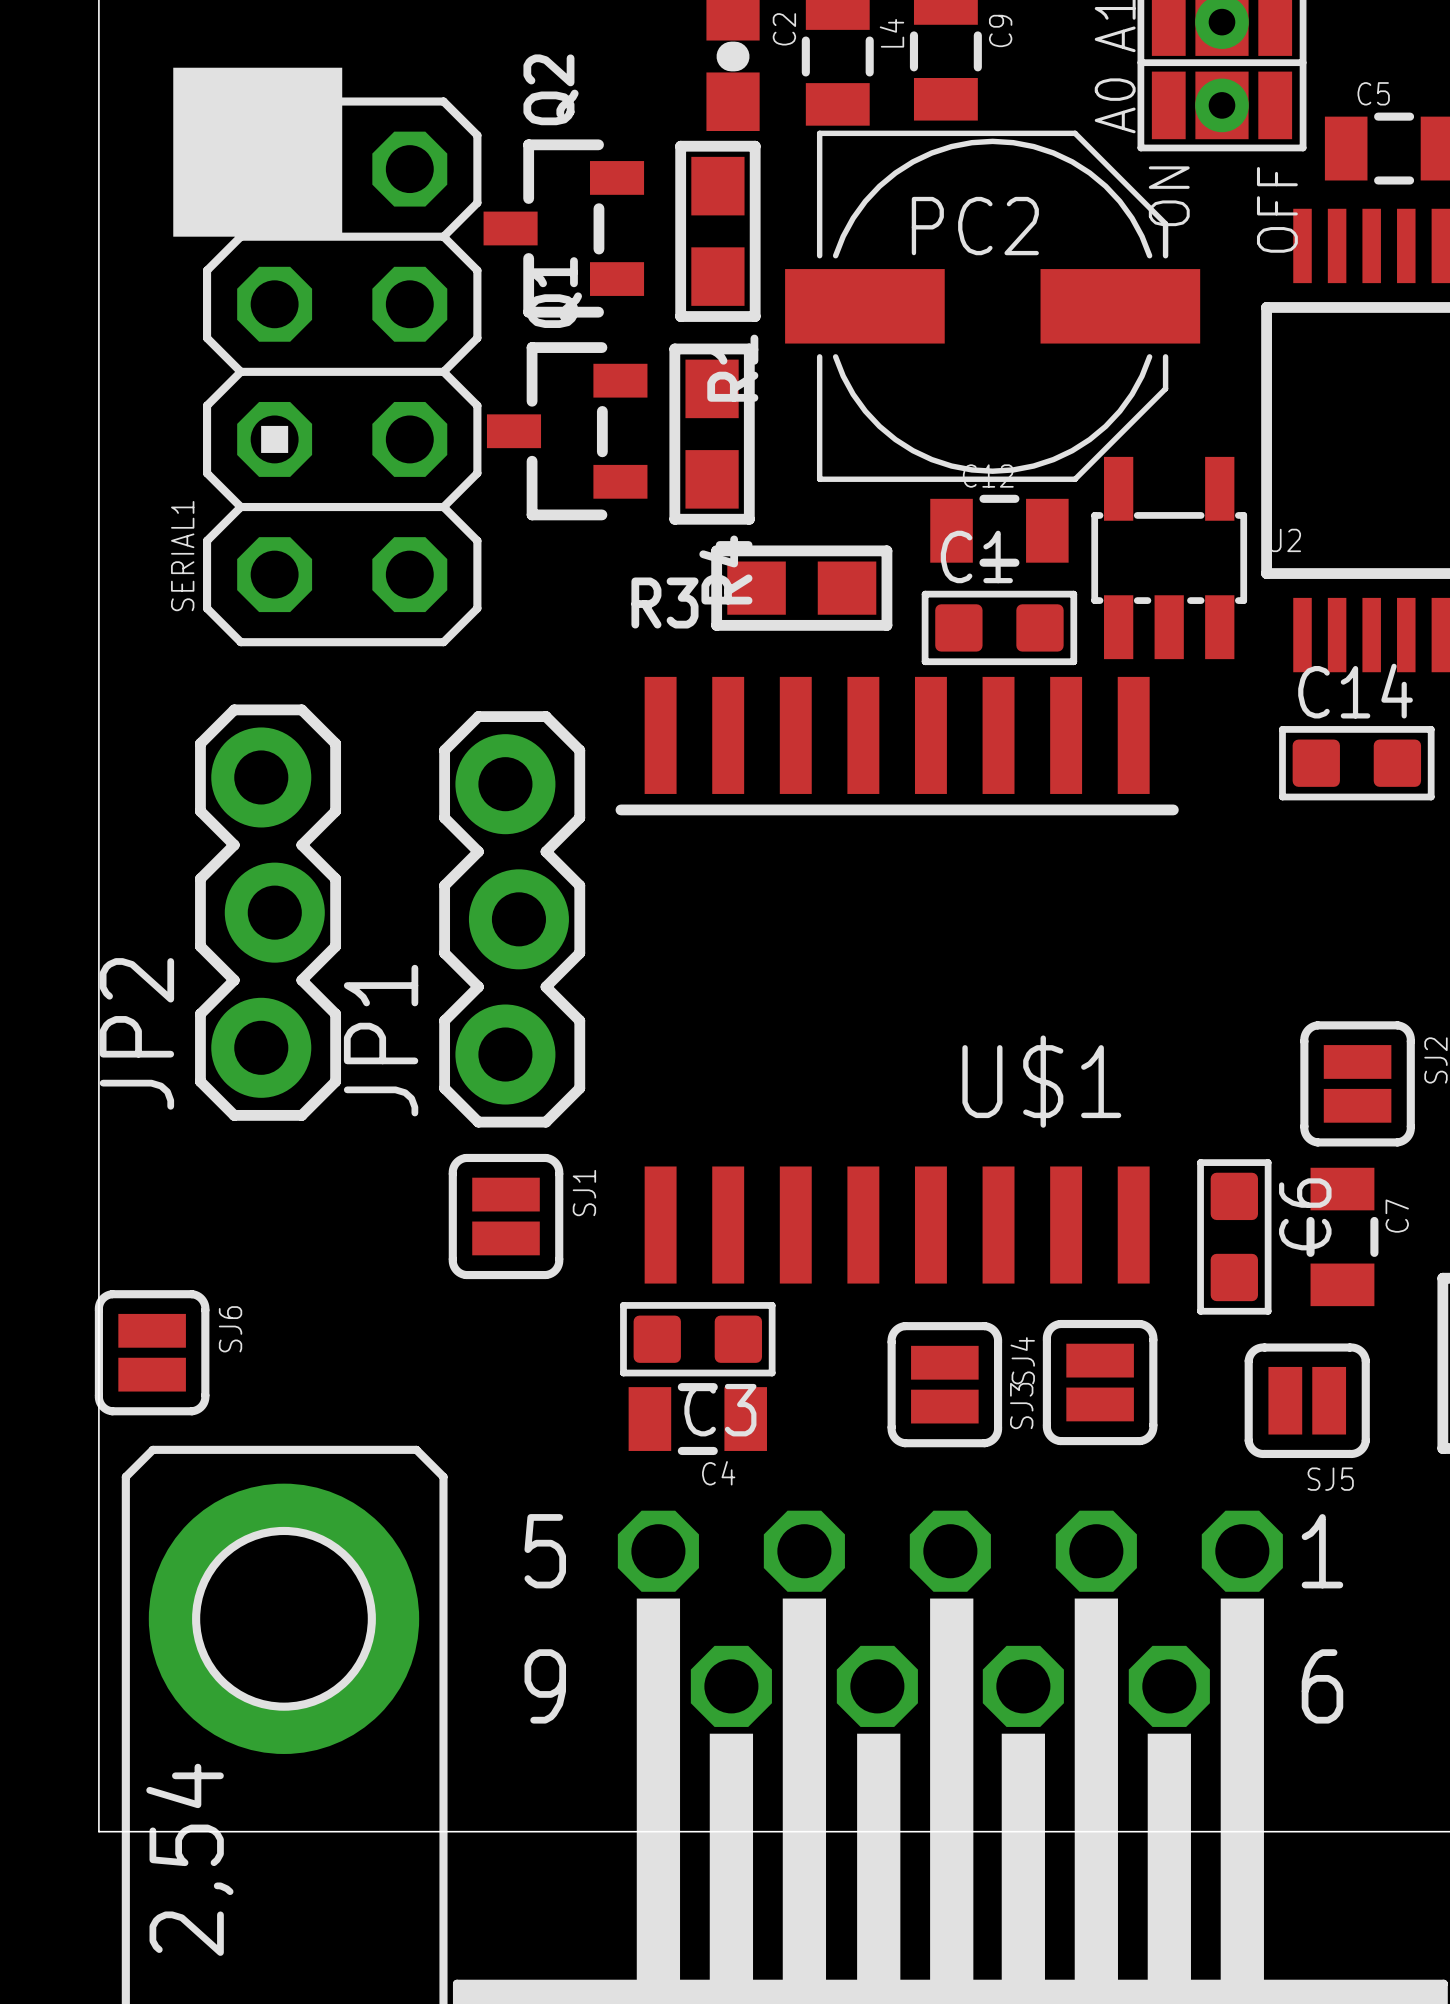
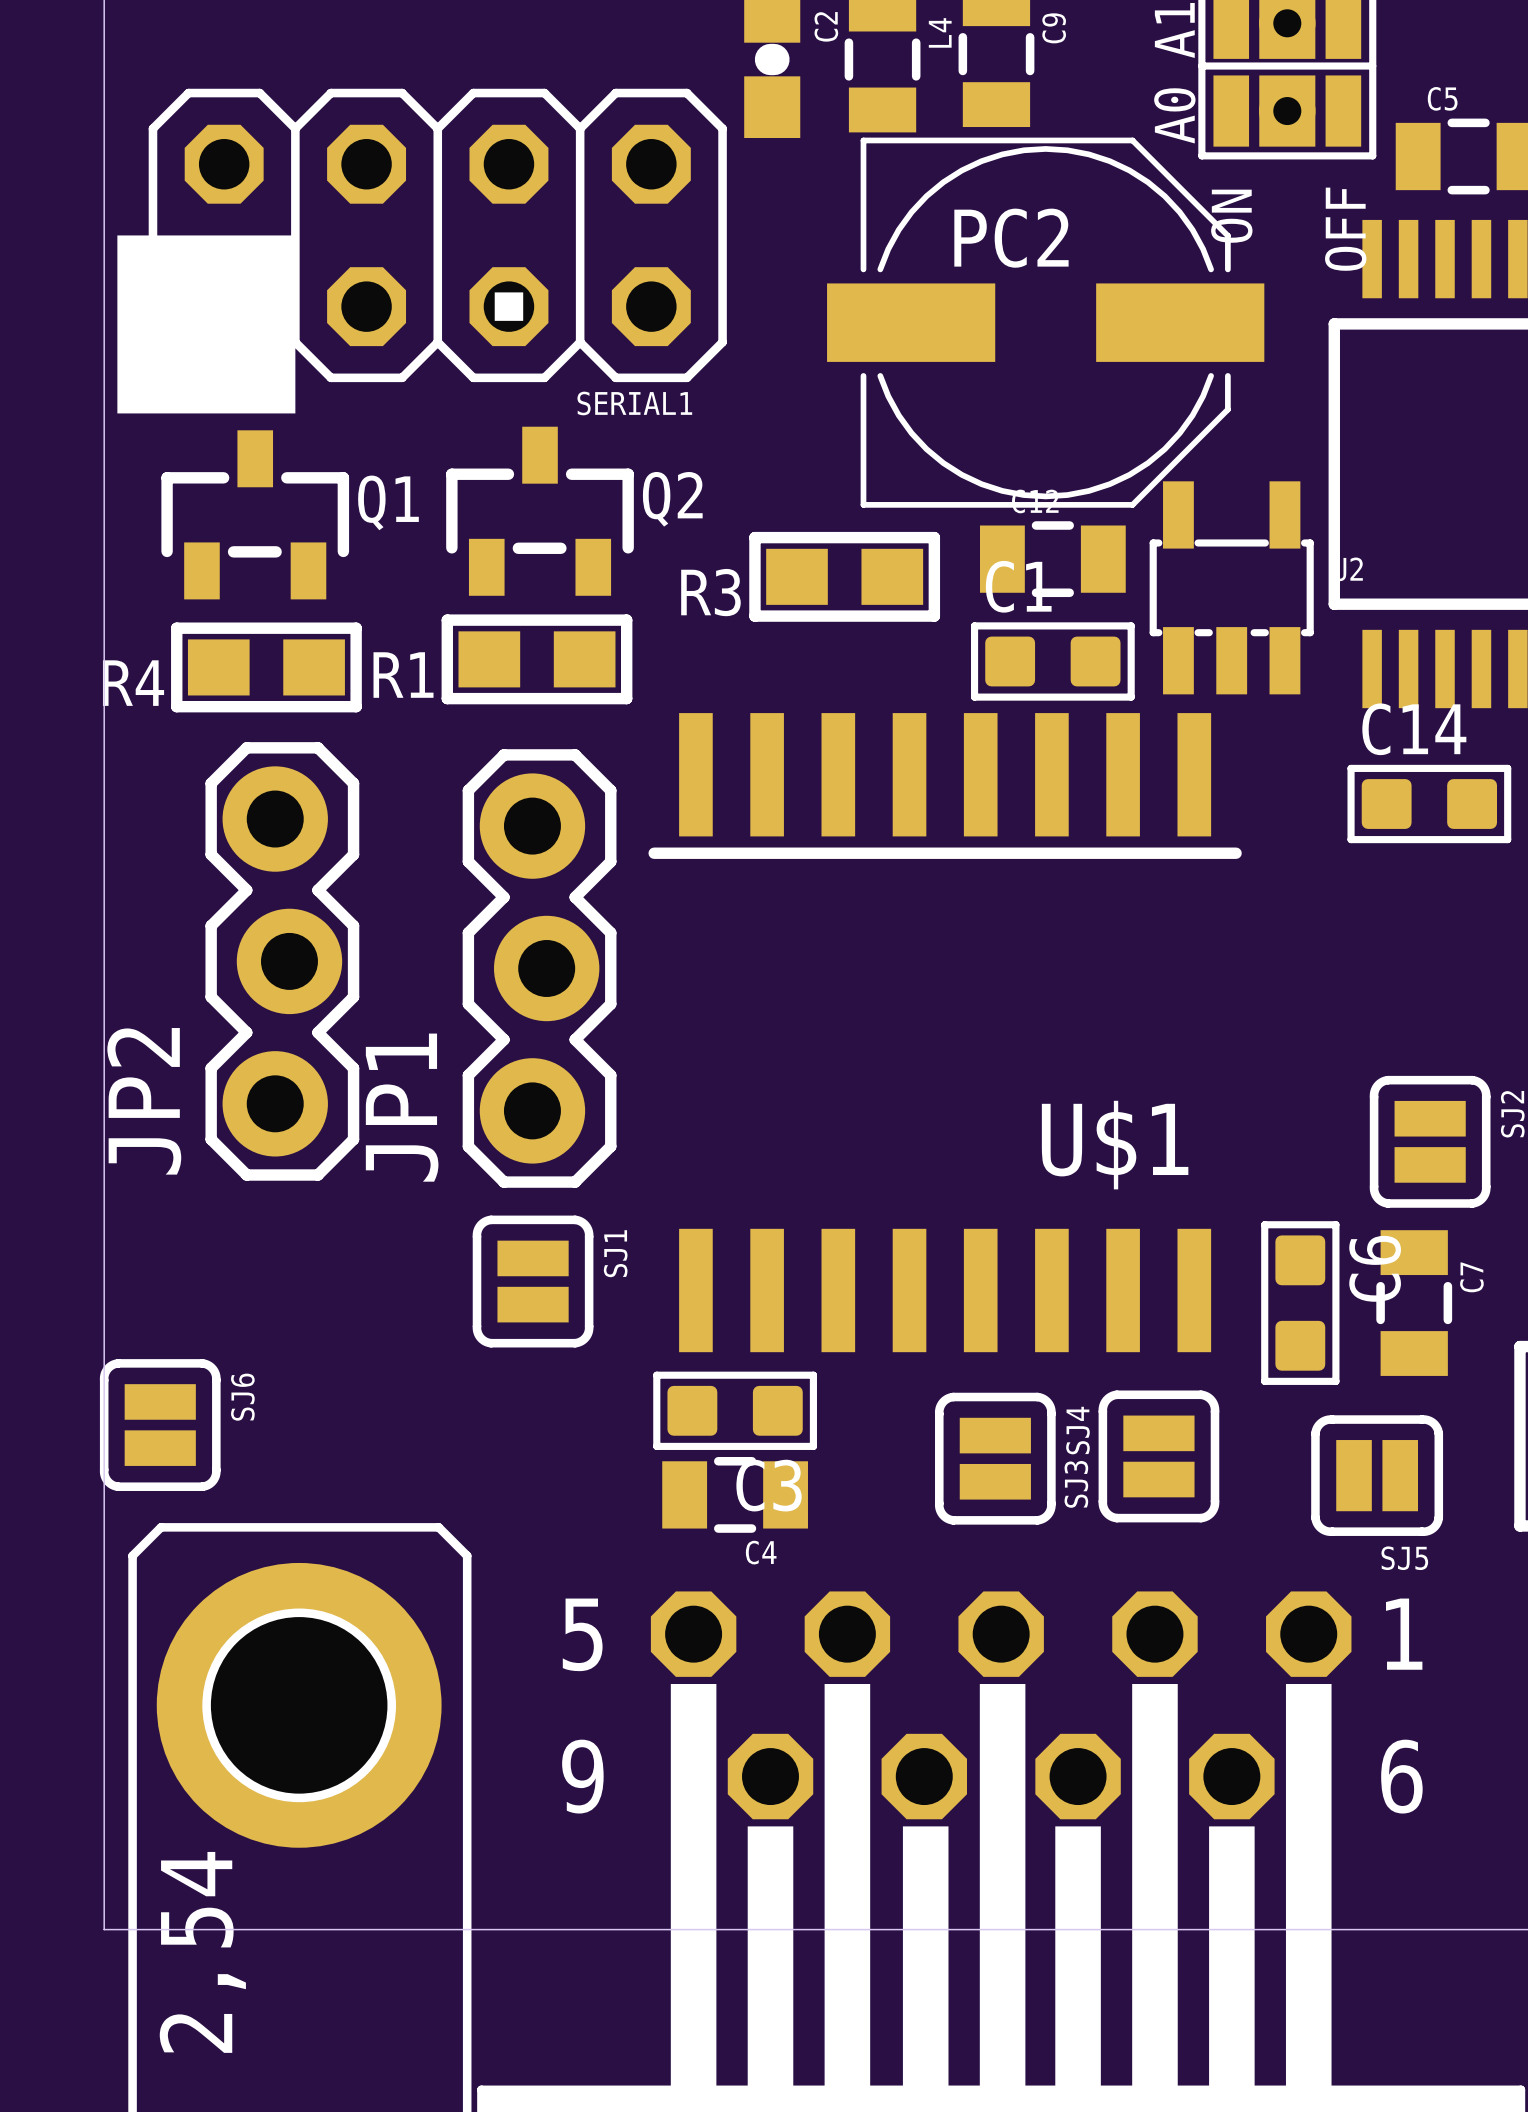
Q2 rotation: 0° (563, 228) -> 90° clockwise (540, 511)
Q2 position: (563, 228) -> (540, 511)
R1 rotation: 0° (717, 231) -> 90° clockwise (536, 659)
R1 position: (717, 231) -> (536, 659)
SERIAL1 rotation: 0° (327, 356) -> 90° counterclockwise (422, 251)
Q1 rotation: 0° (567, 431) -> 90° clockwise (255, 514)
Q1 position: (567, 431) -> (255, 514)
R4 rotation: 0° (712, 434) -> 90° clockwise (266, 667)
R4 position: (712, 434) -> (266, 667)
R3 position: (801, 588) -> (844, 576)

